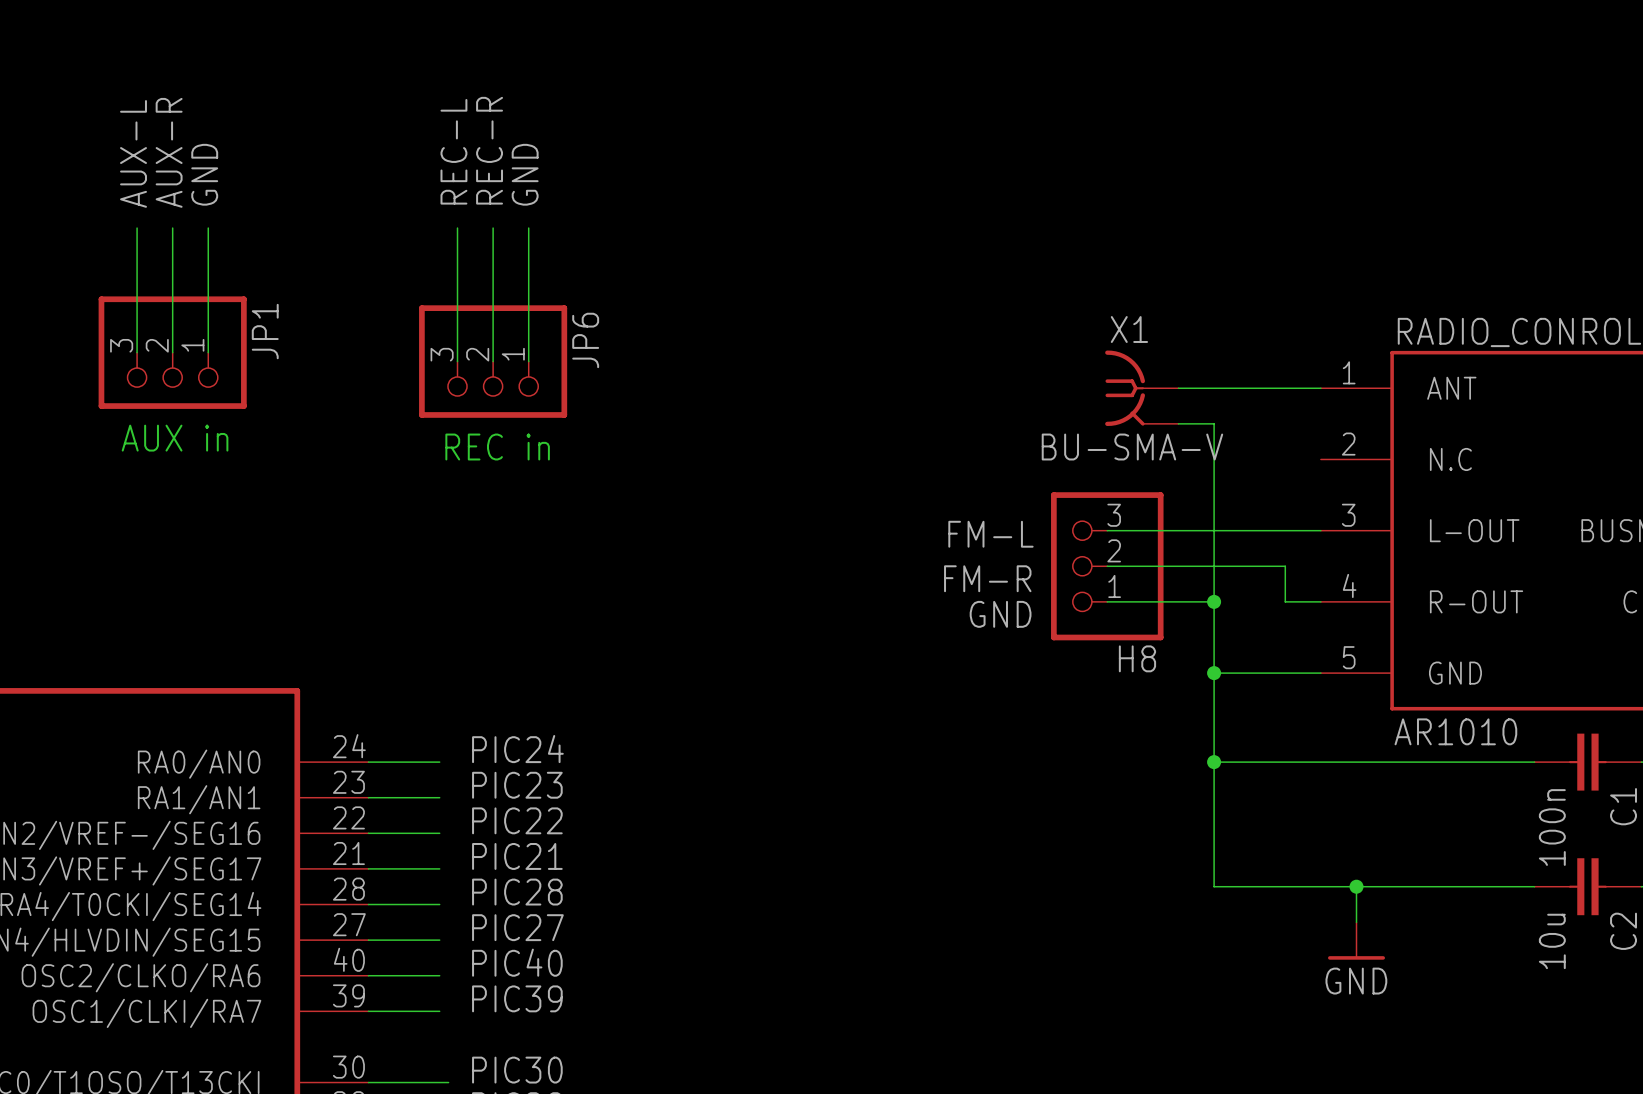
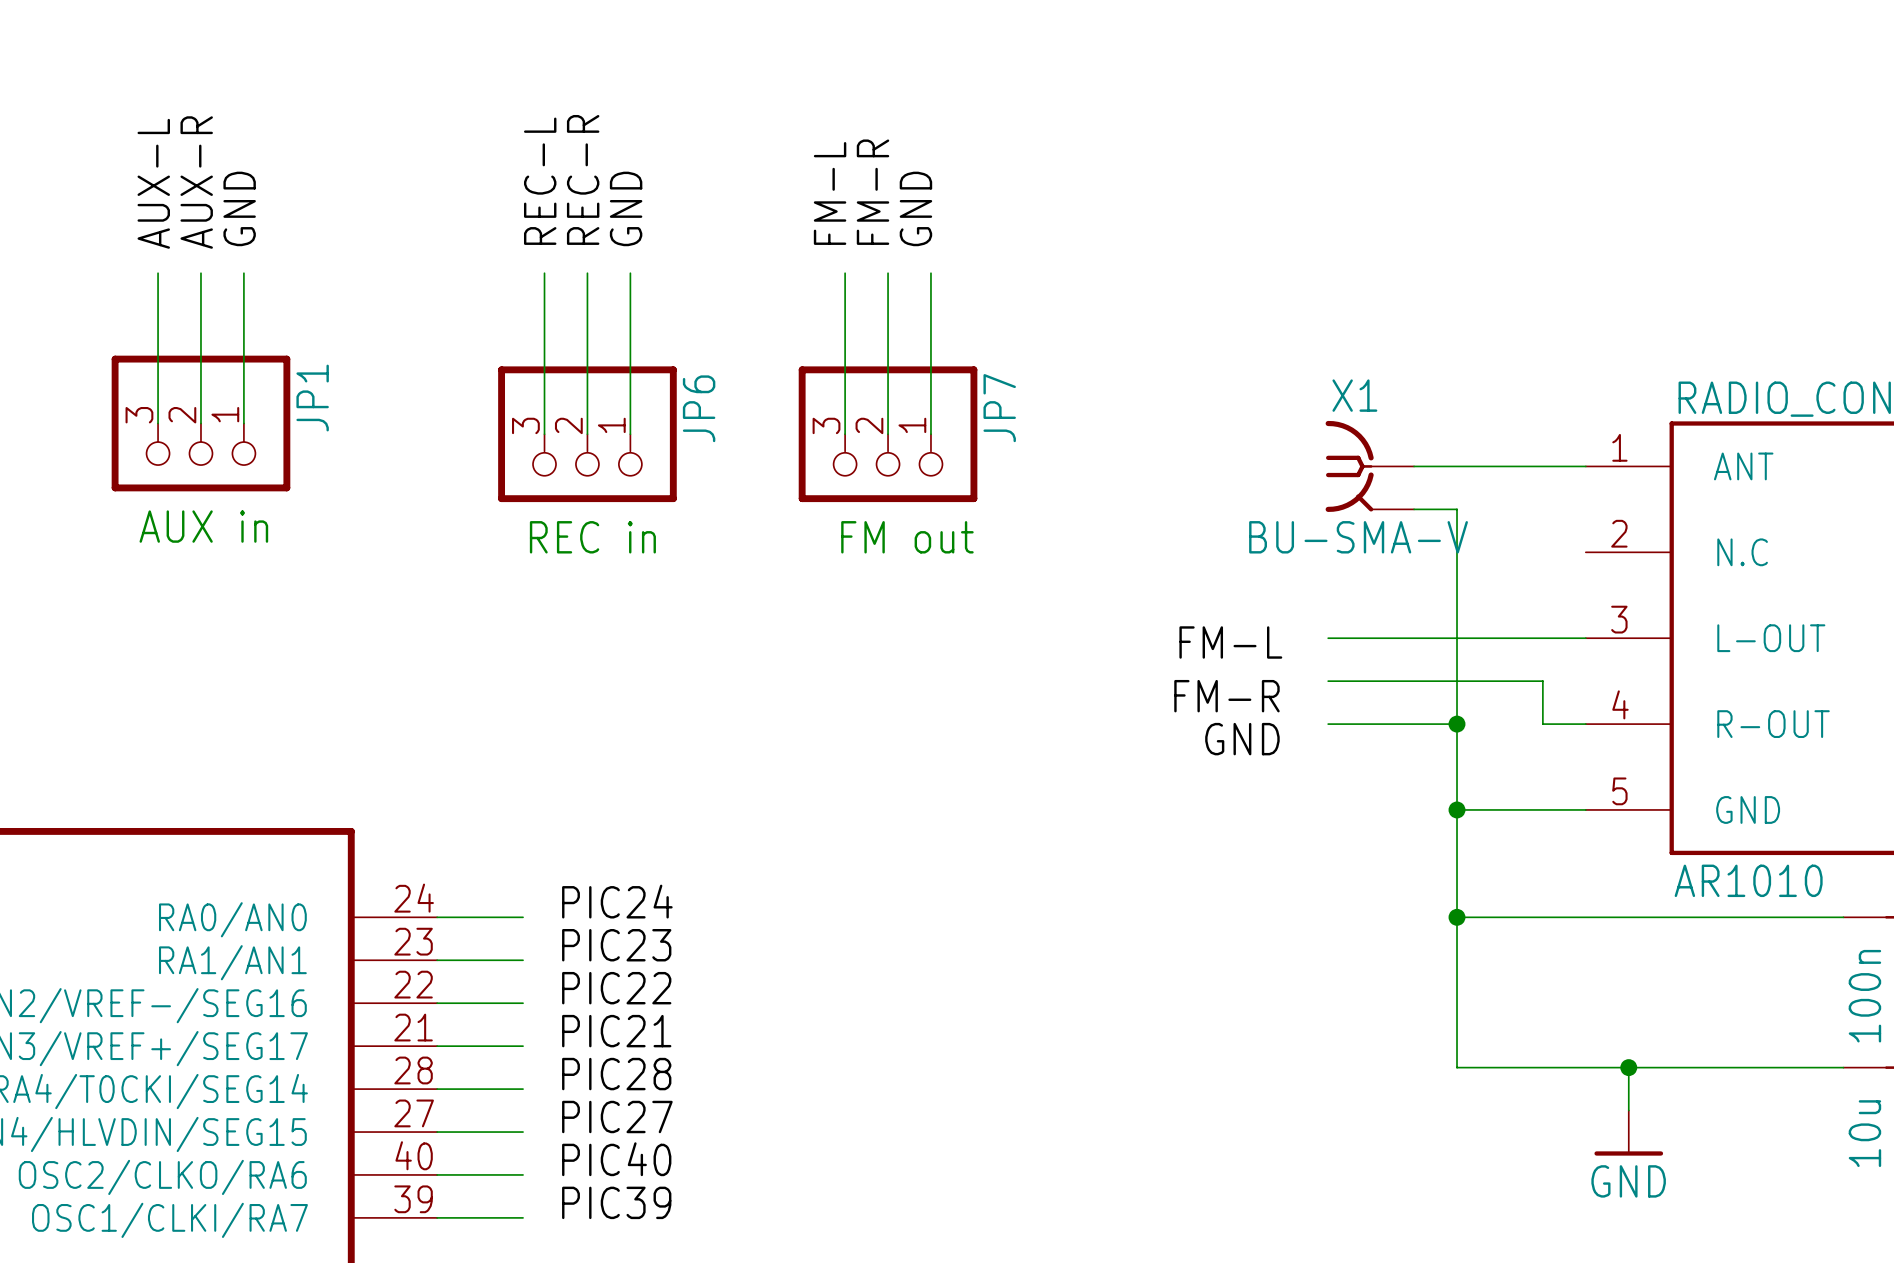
label: none -> FM-R (873, 192)
label: none -> FM-L (830, 193)
label: none -> GND (915, 208)
wire: none -> (845, 273) (845, 434)
wire: none -> (888, 273) (888, 434)
wire: none -> (930, 273) (930, 434)
JP7: none -> (888, 434)
text: none -> FM out (907, 537)
label position: FM-L (990, 534) -> FM-L (1230, 642)
H8: (1107, 566) -> none
label position: FM-R (987, 578) -> FM-R (1226, 696)
label position: GND (1000, 614) -> GND (1242, 739)

